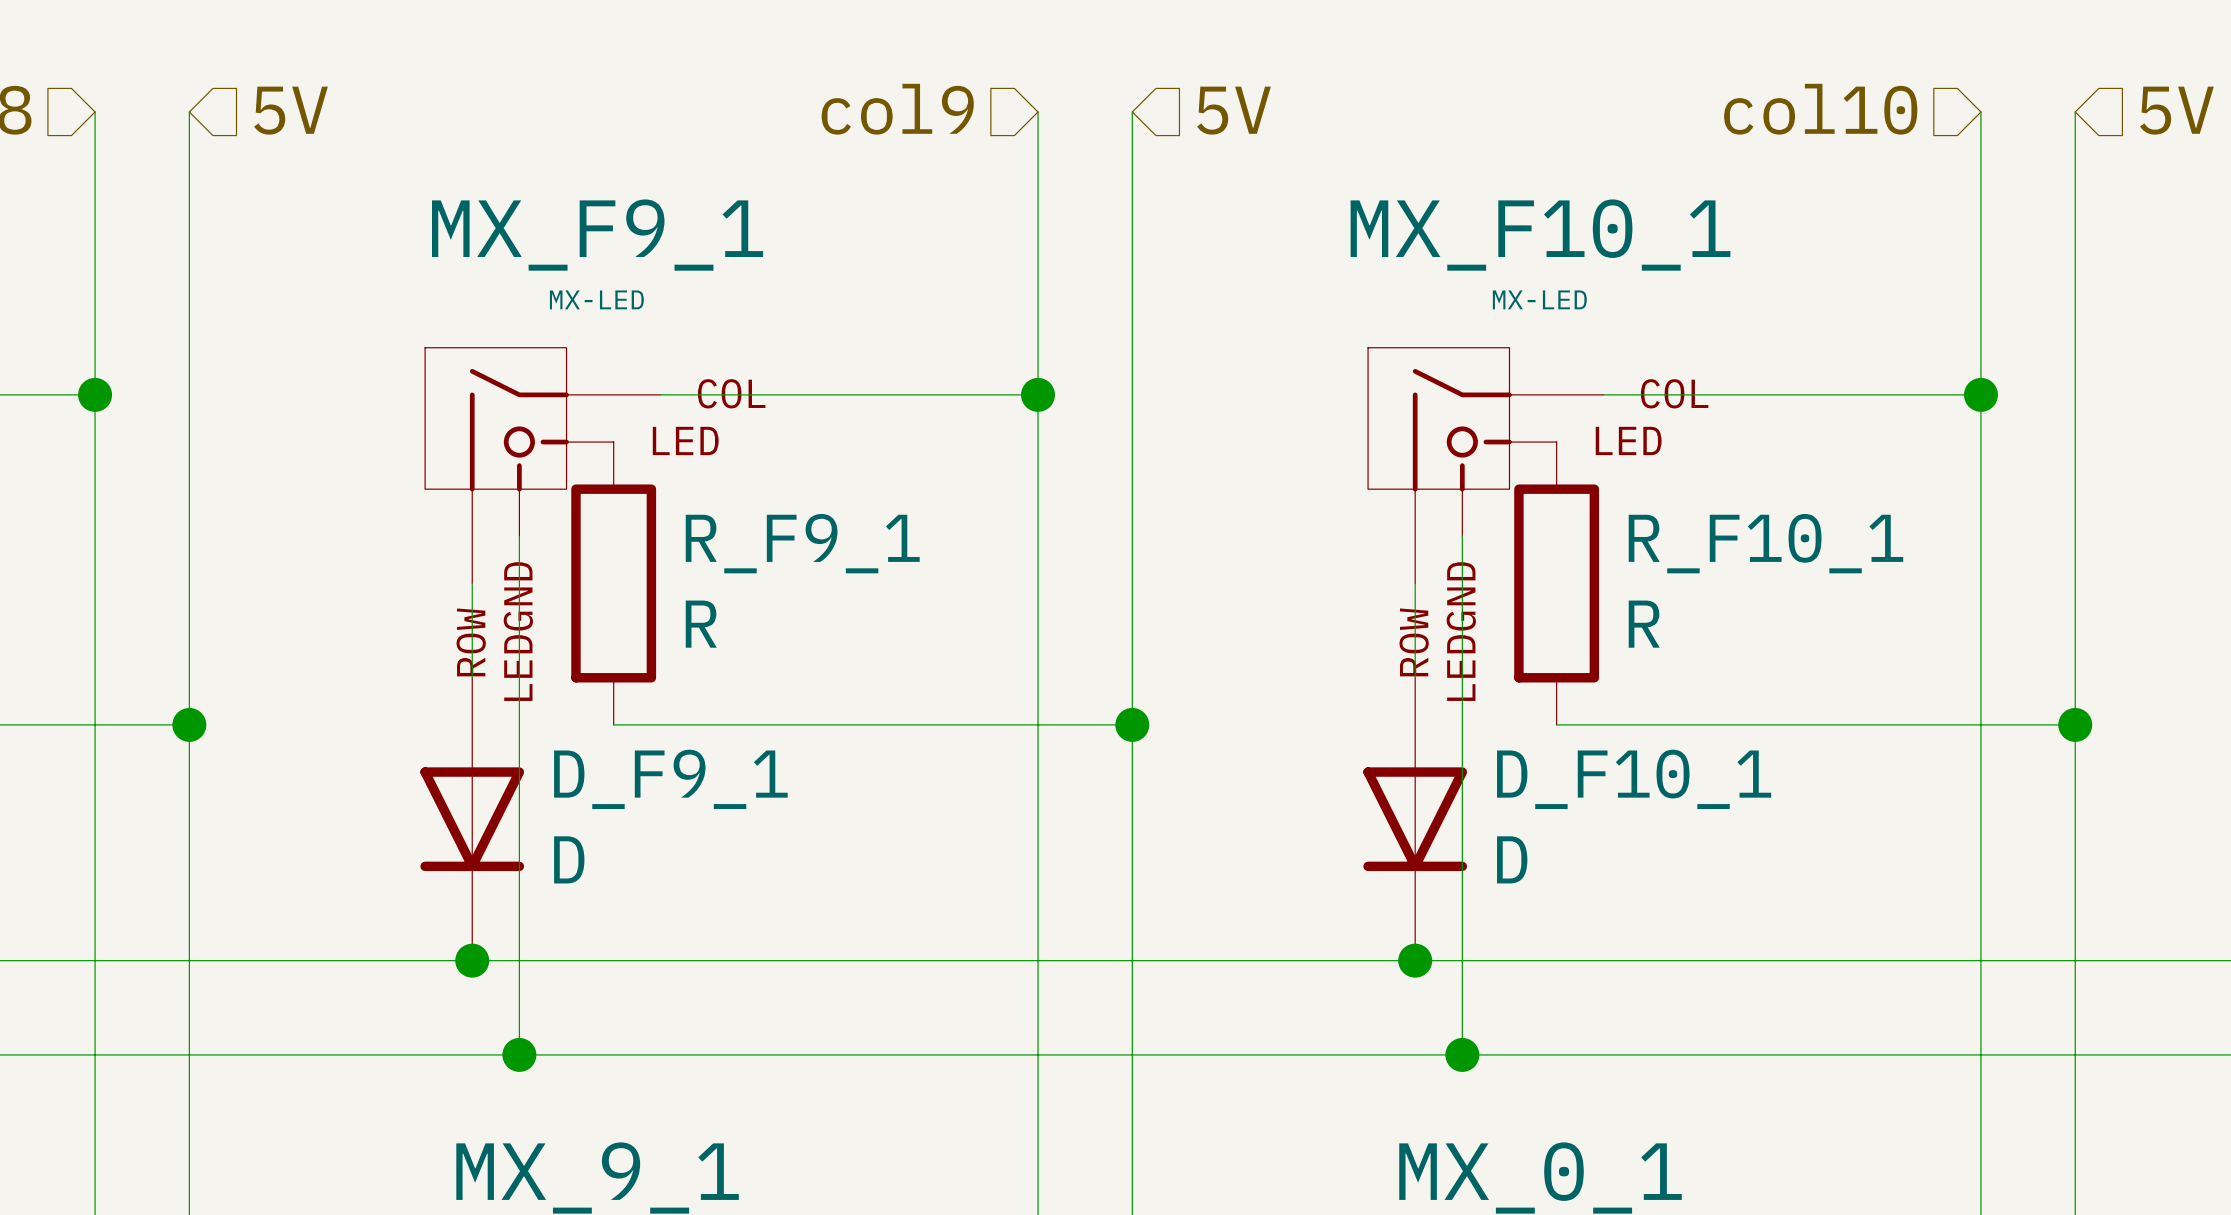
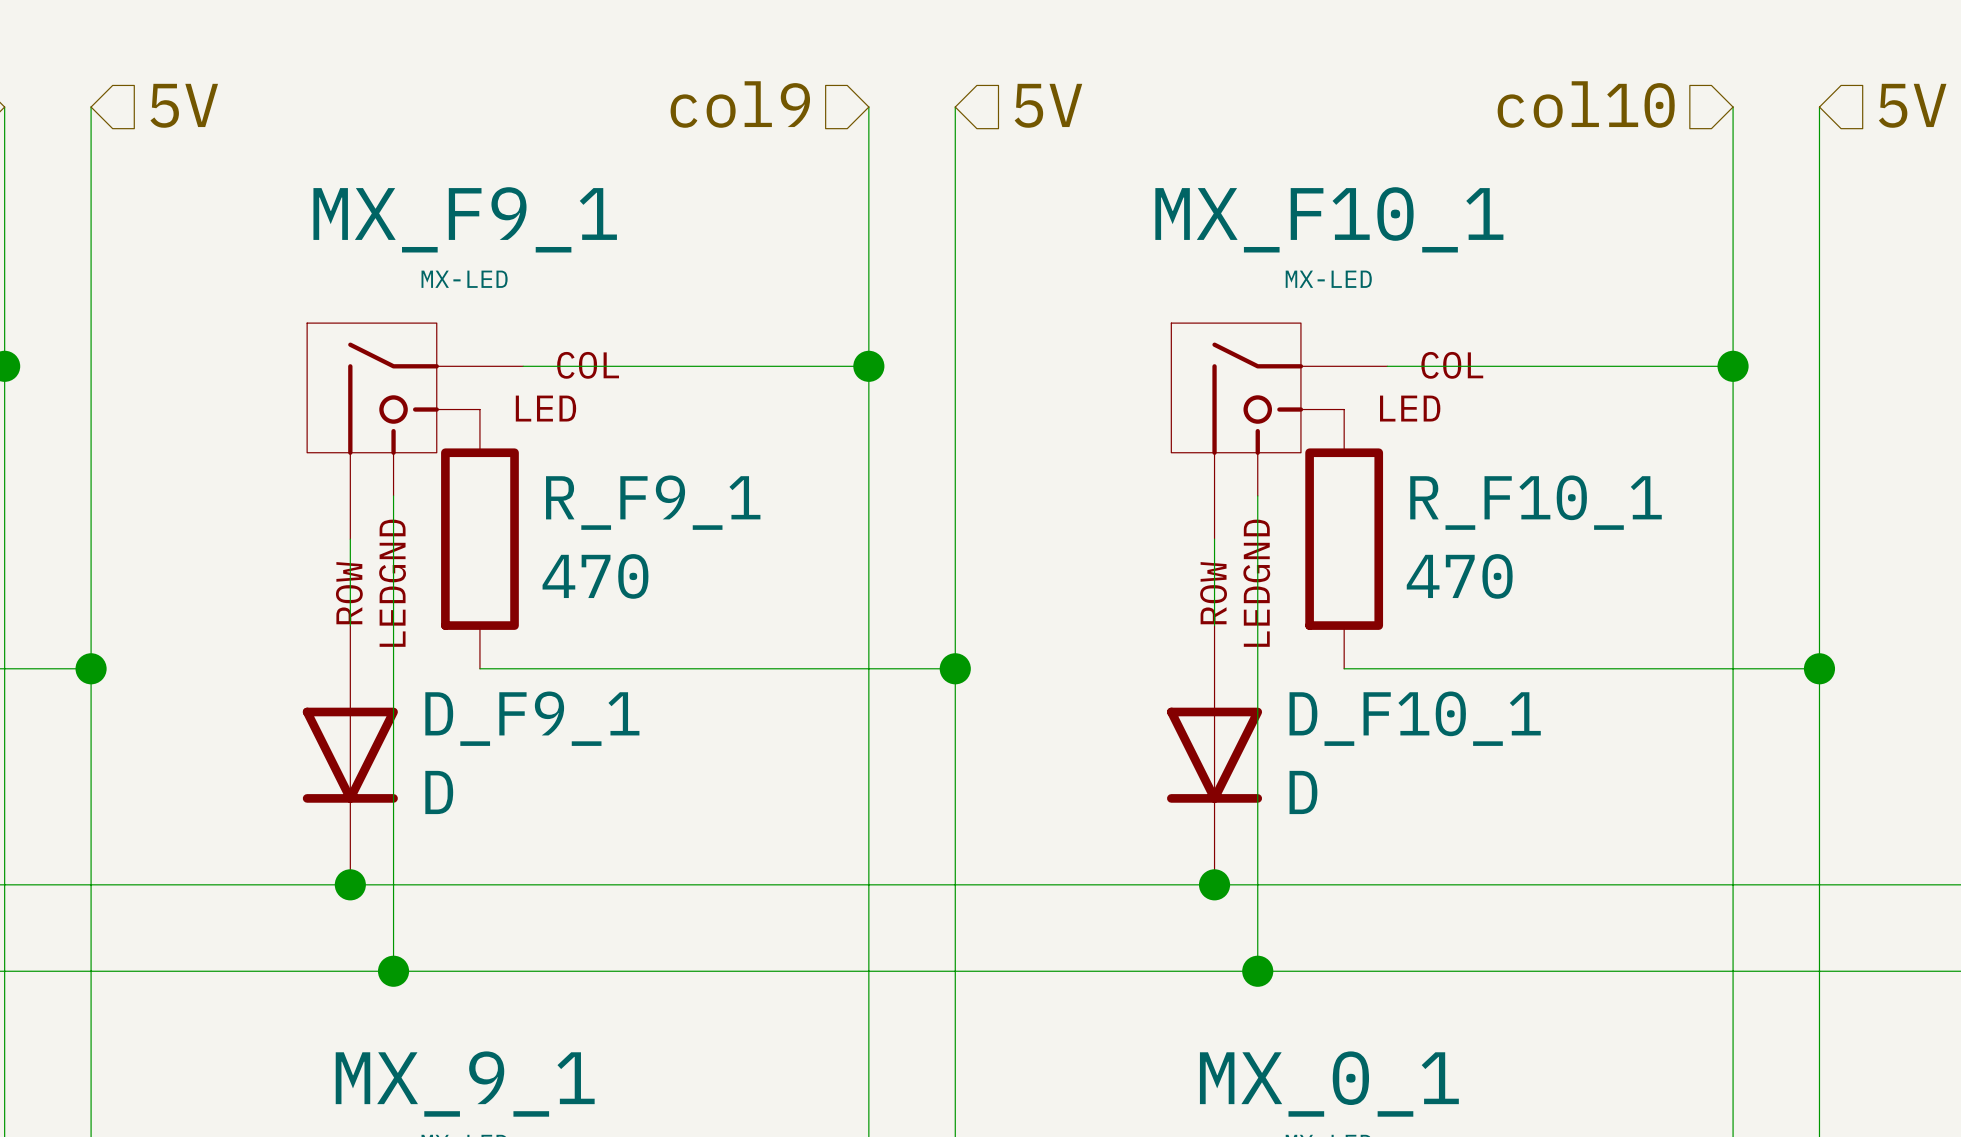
R_F9_1 value: R (701, 624) -> 470 (595, 576)
R_F10_1 value: R (1644, 624) -> 470 (1459, 576)

